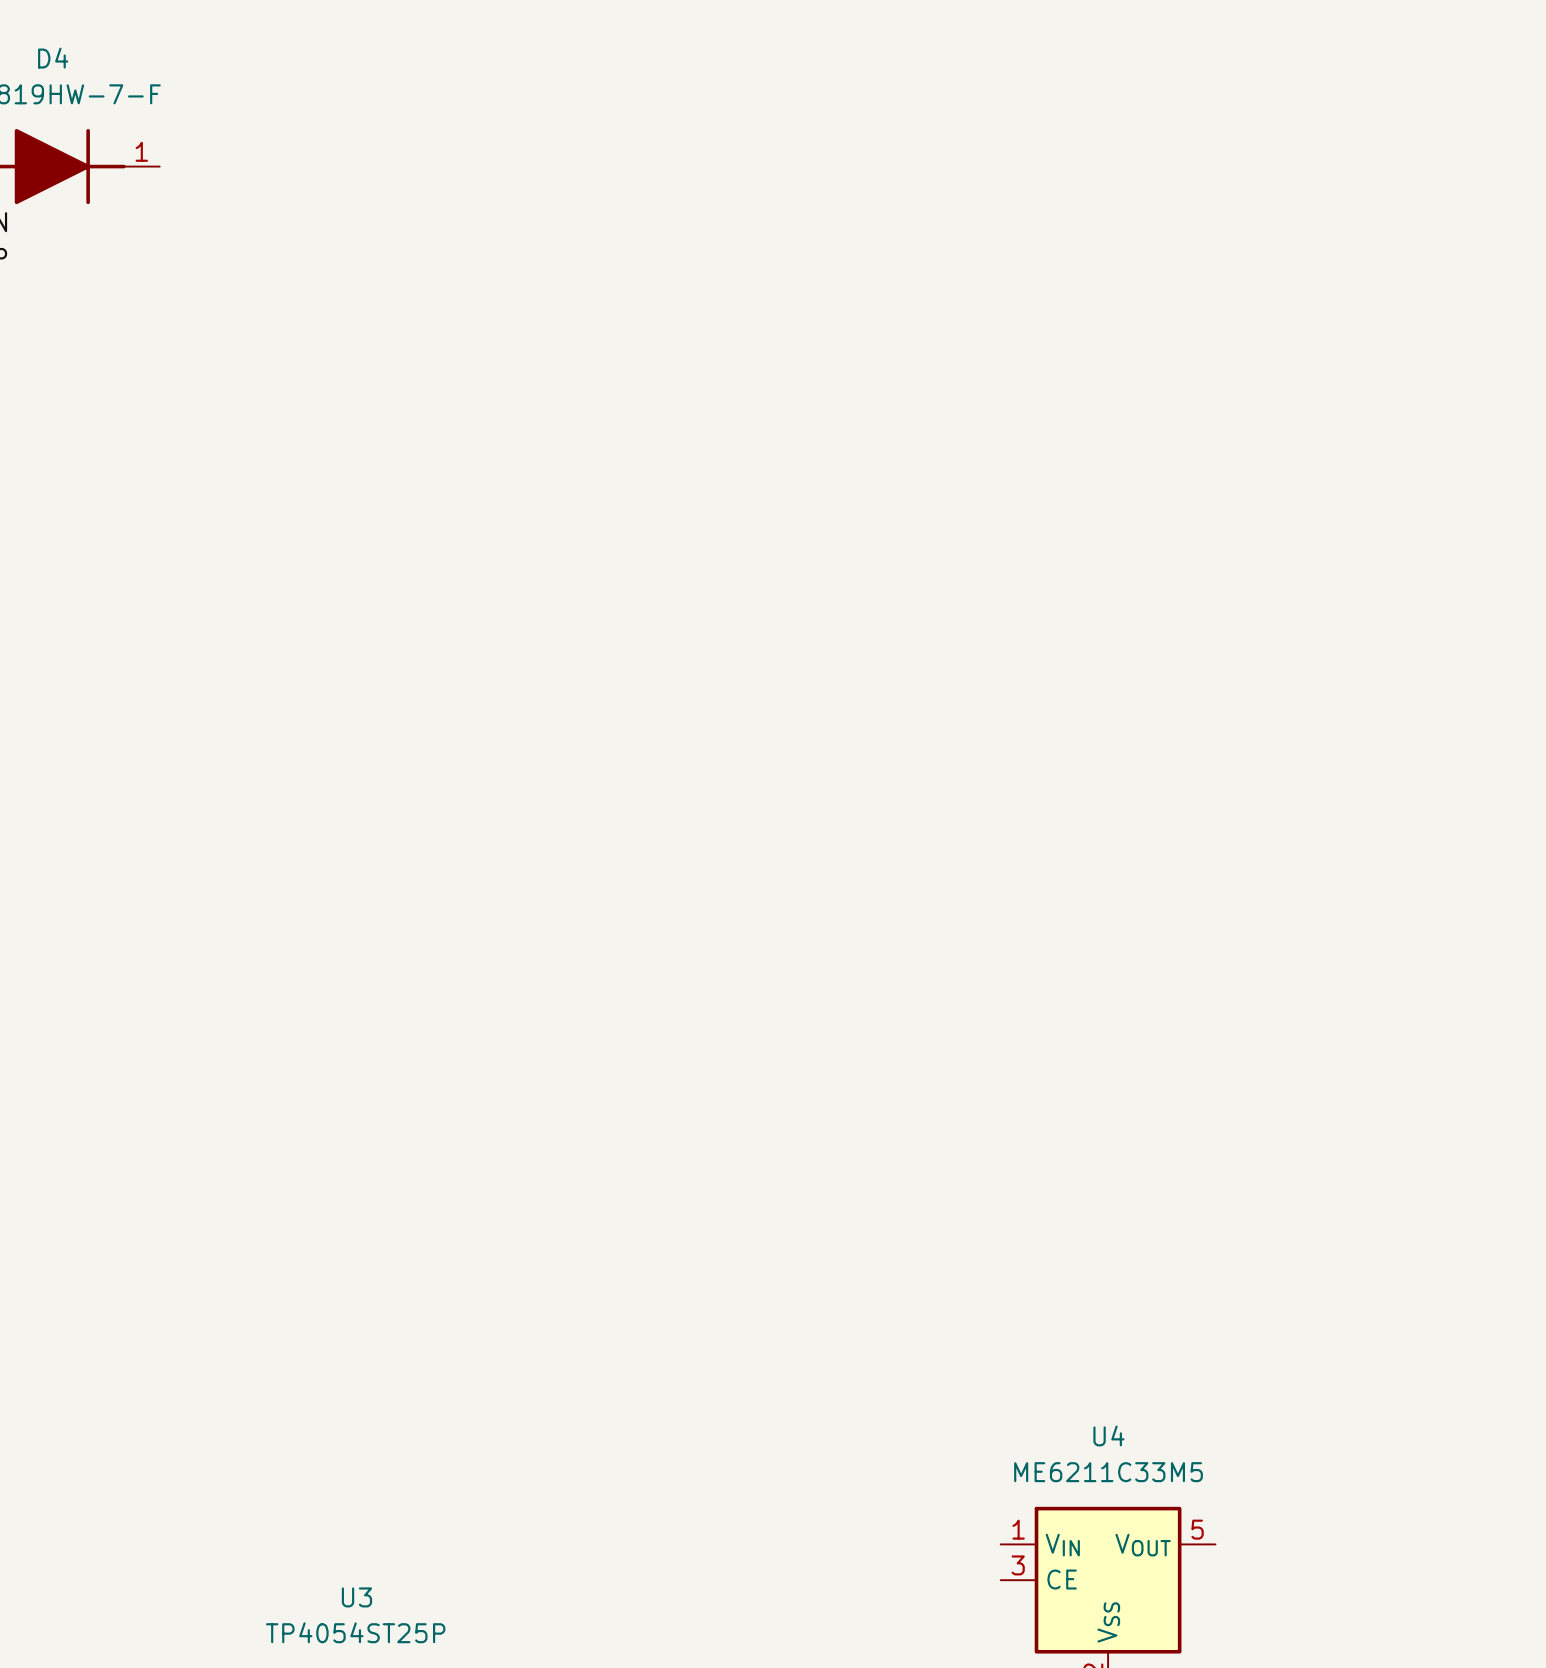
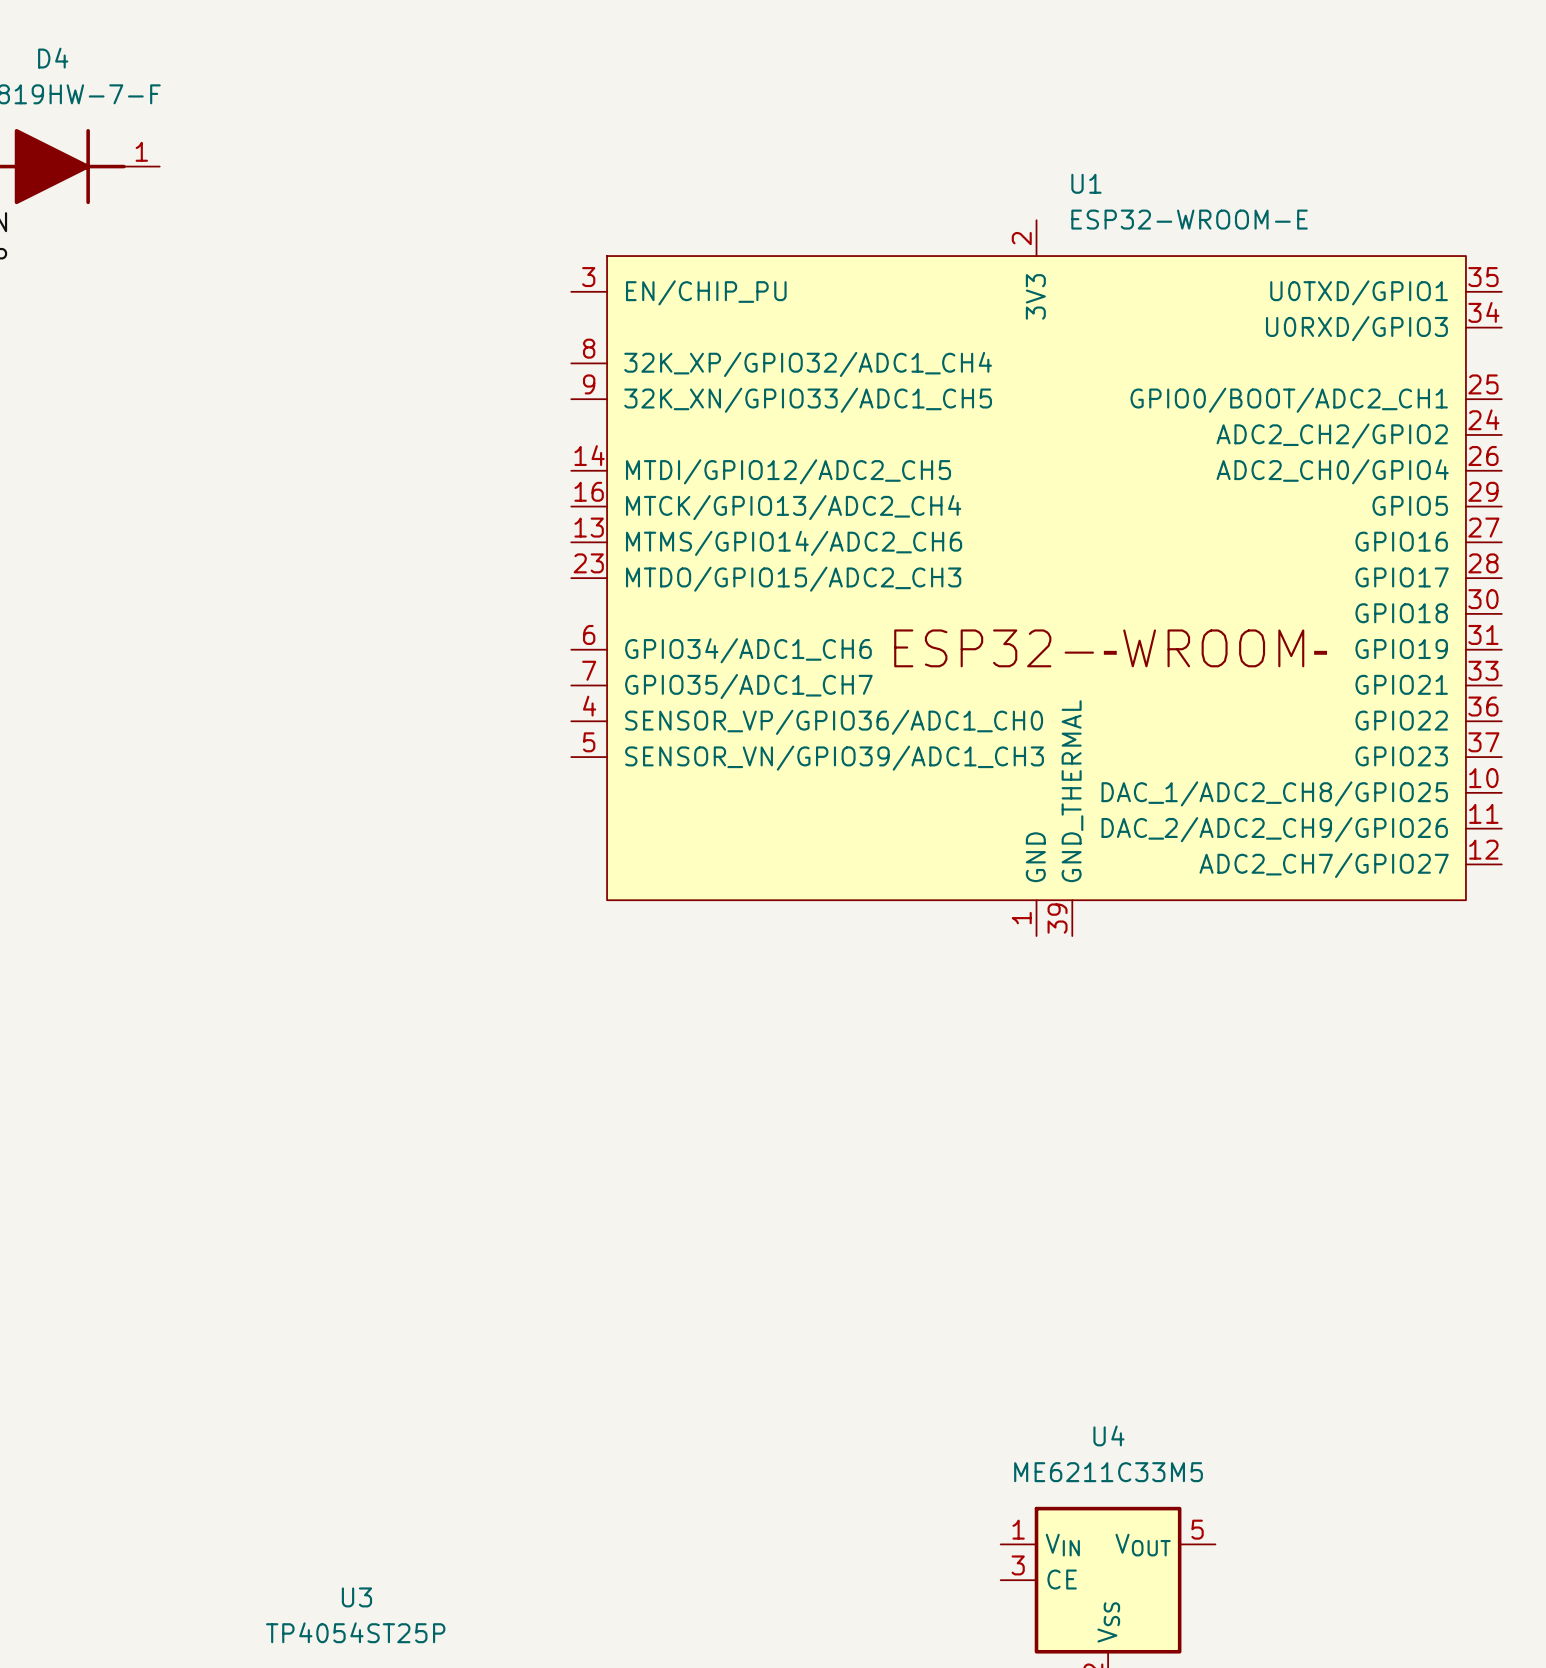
U1: none -> ESP32-WROOM-E (1036, 578)

